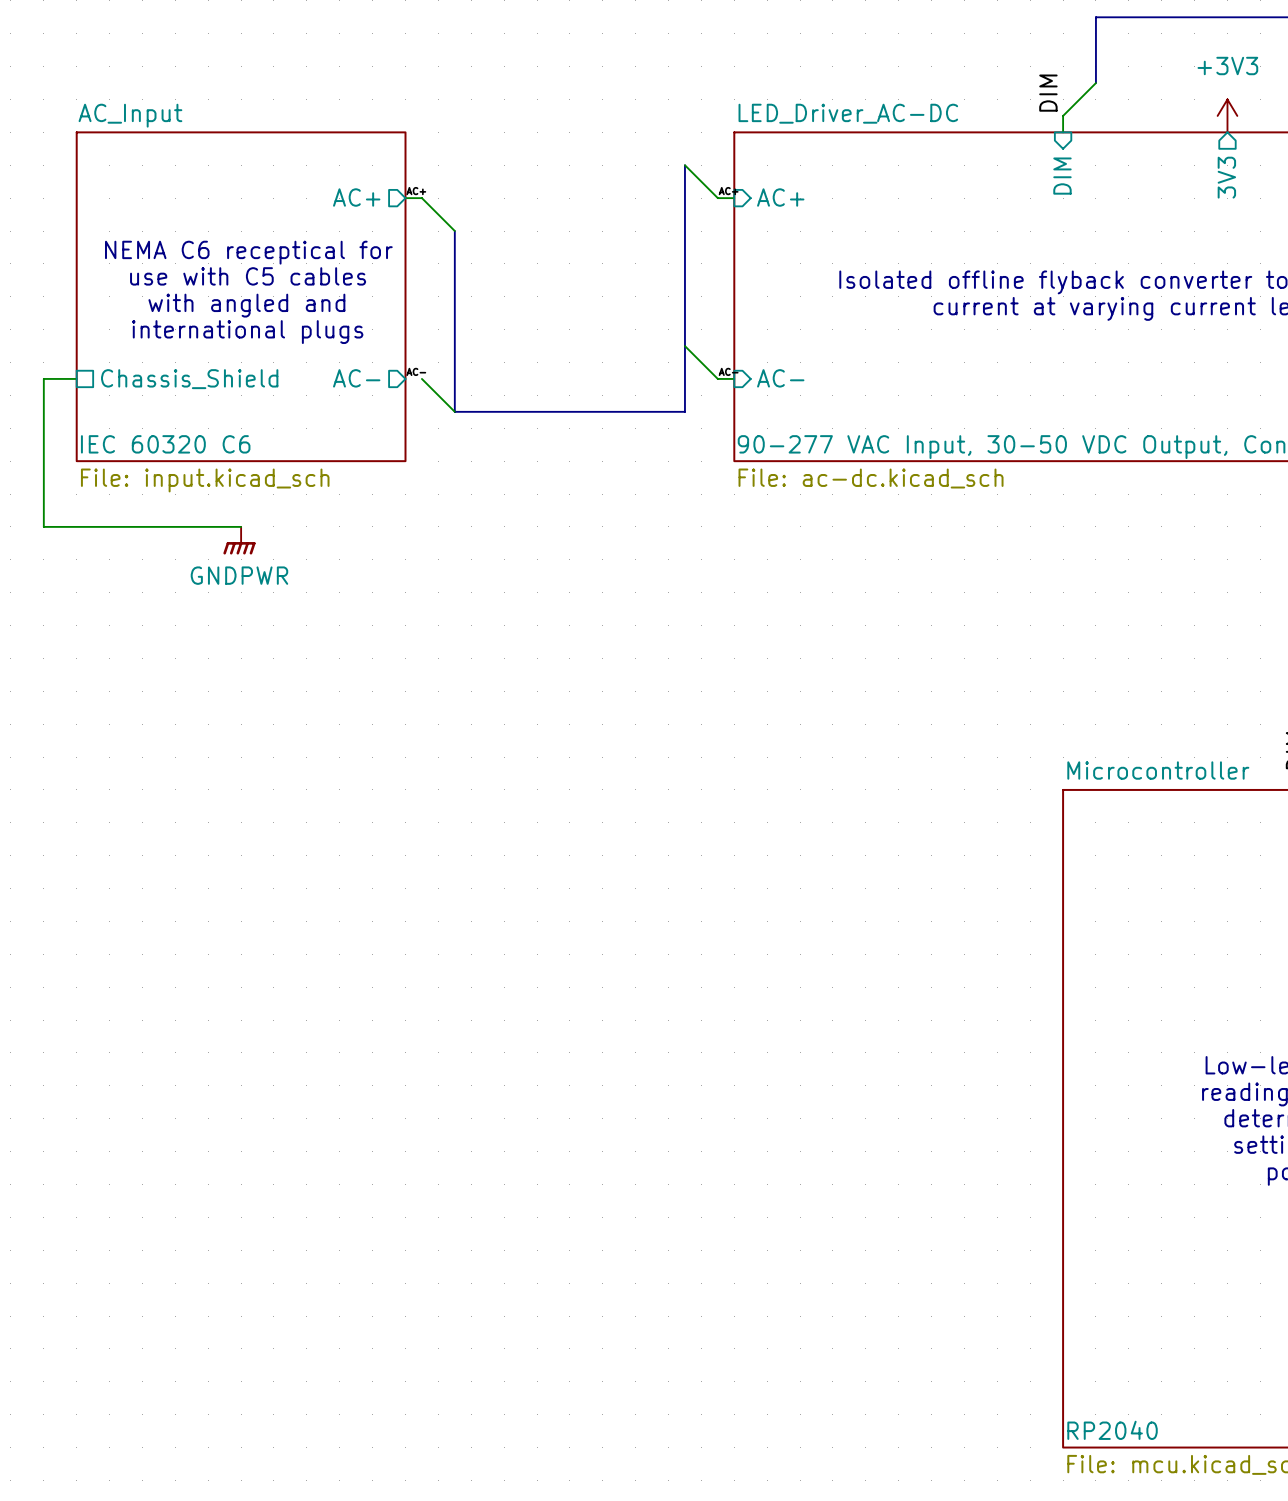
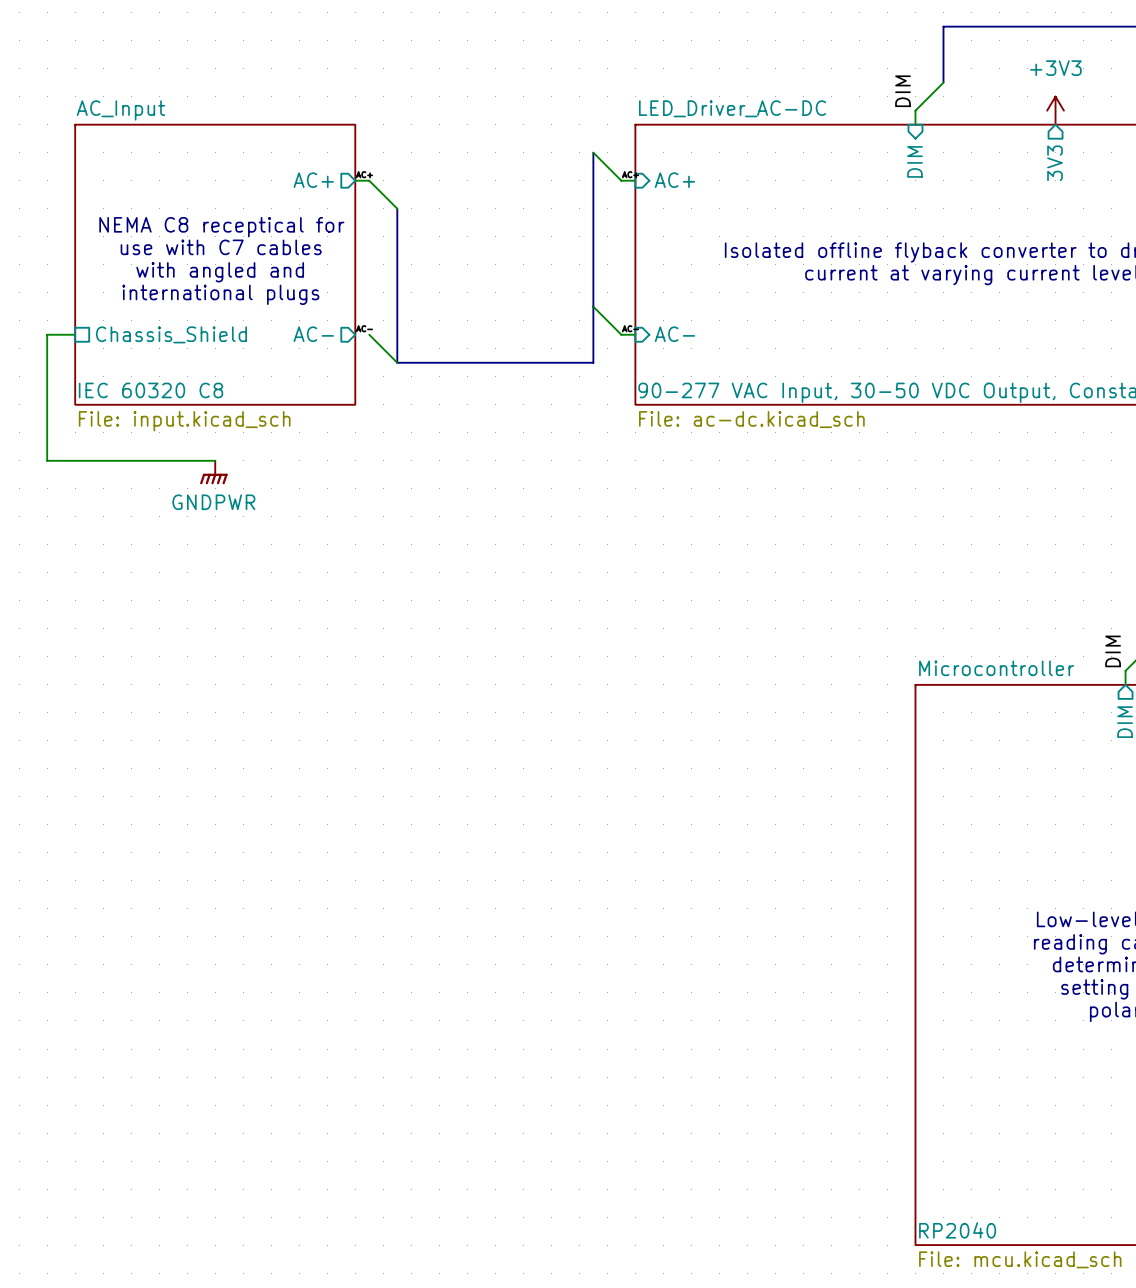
text: NEMA C6 receptical for (248, 252) -> NEMA C8 receptical for (221, 227)
text: use with C5 cables (248, 276) -> use with C7 cables (221, 247)
sheet AC_Input text: IEC 60320 C6 (165, 444) -> IEC 60320 C8 (150, 390)

